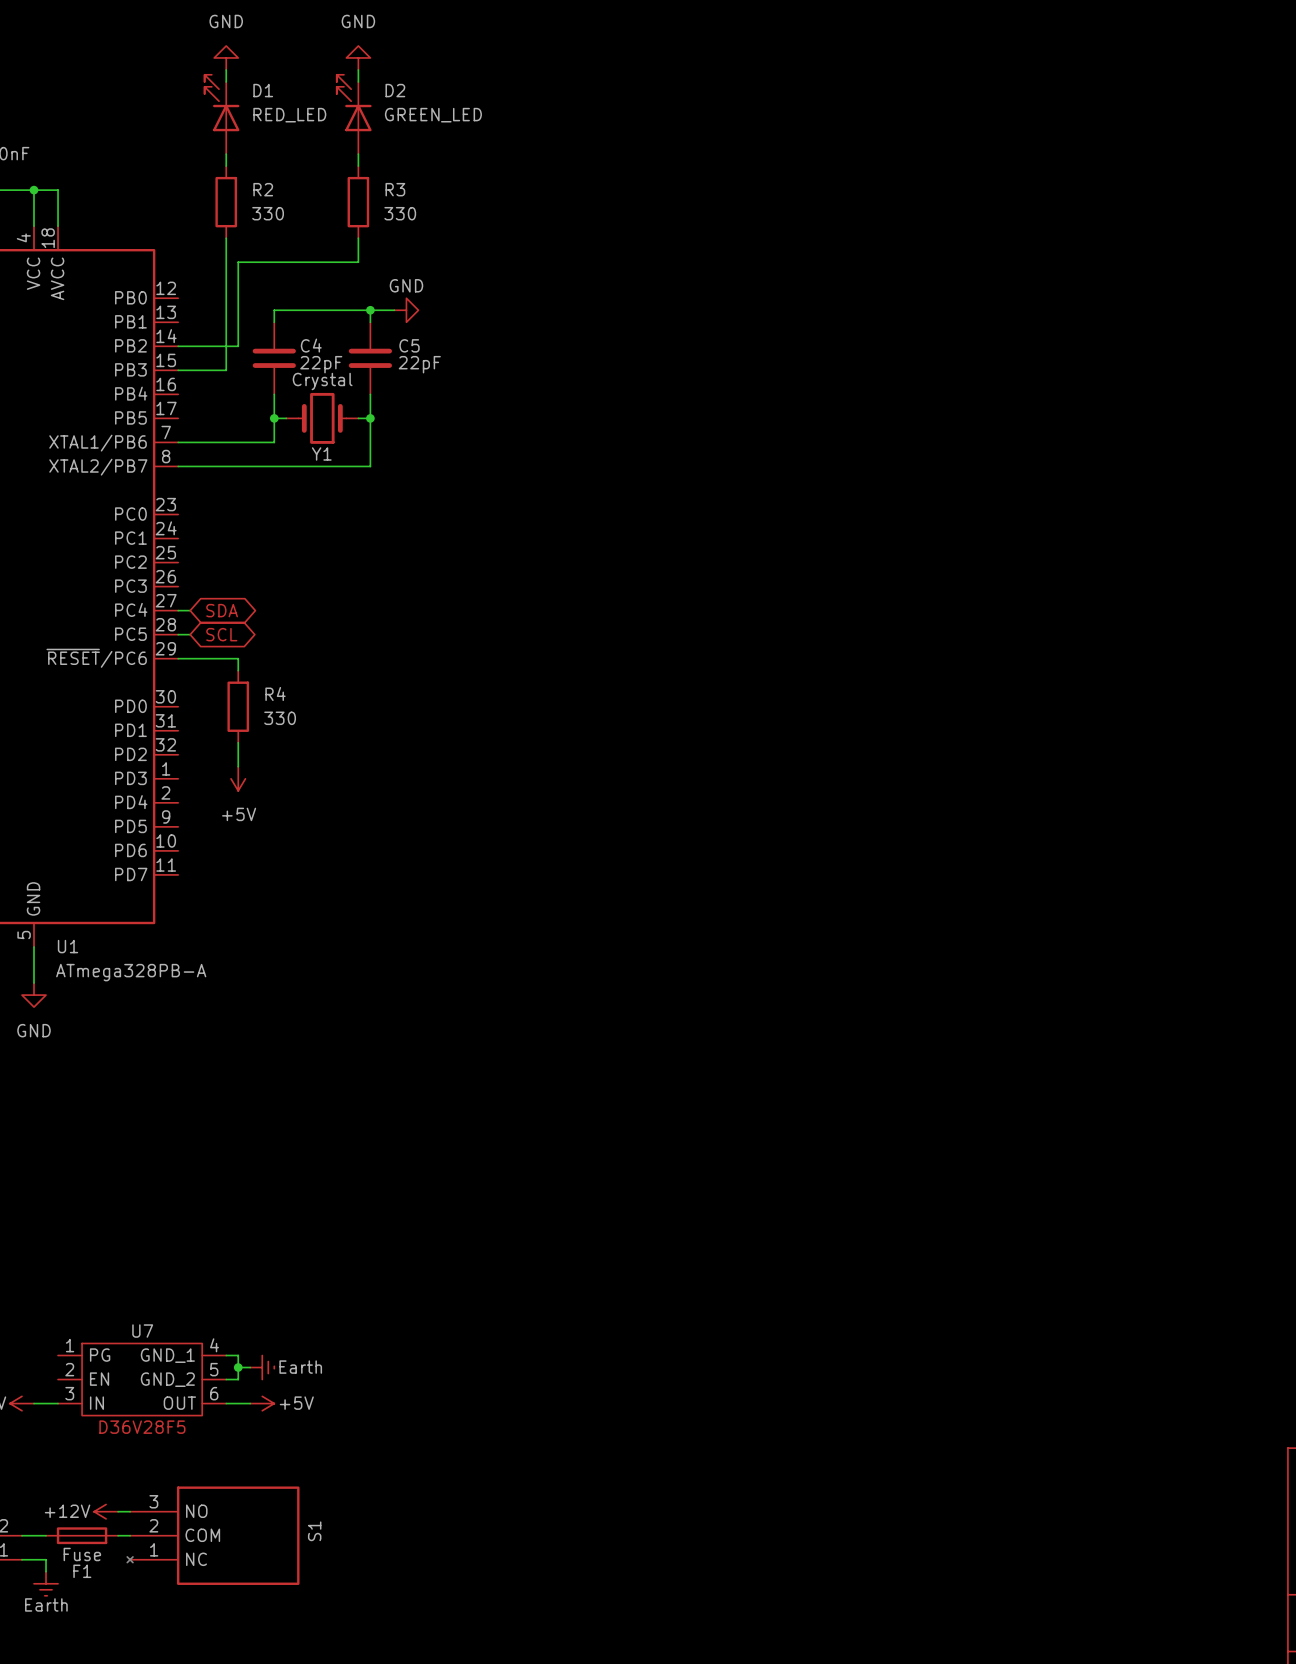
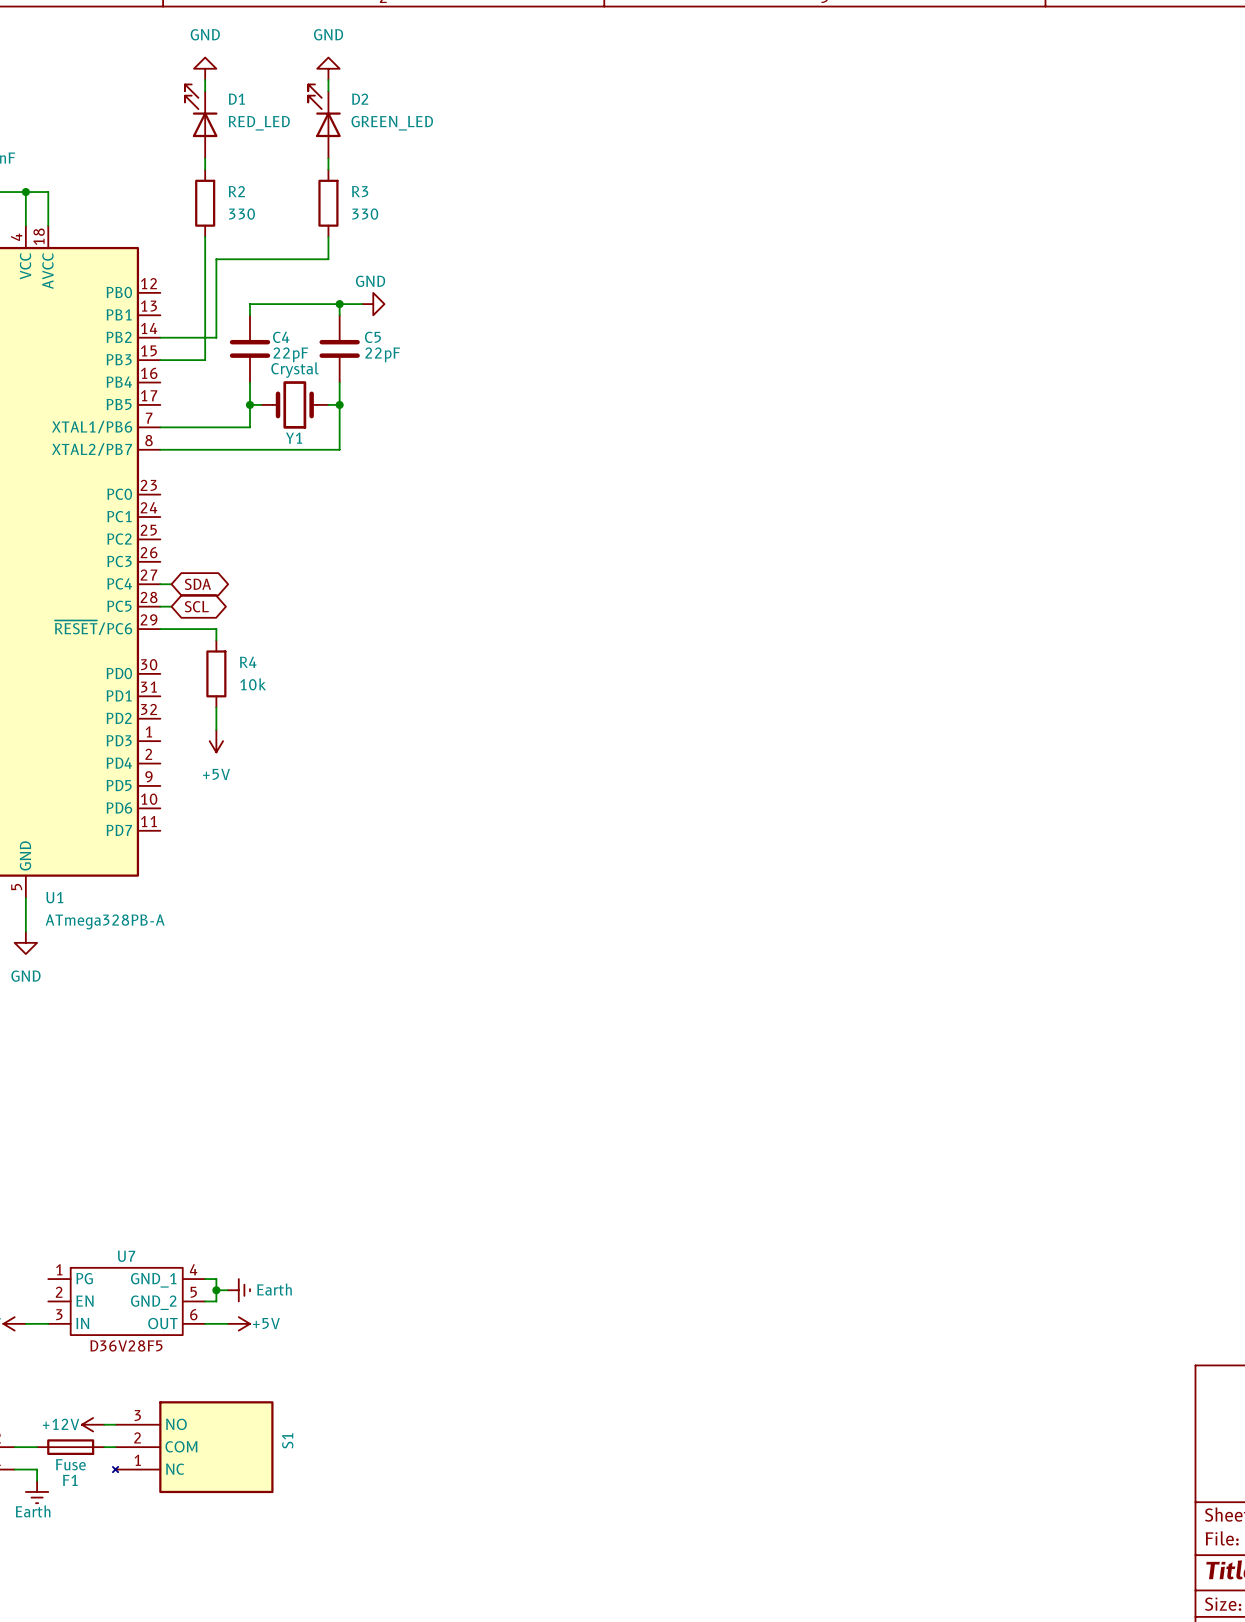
R4 value: 330 (280, 718) -> 10k (253, 684)

